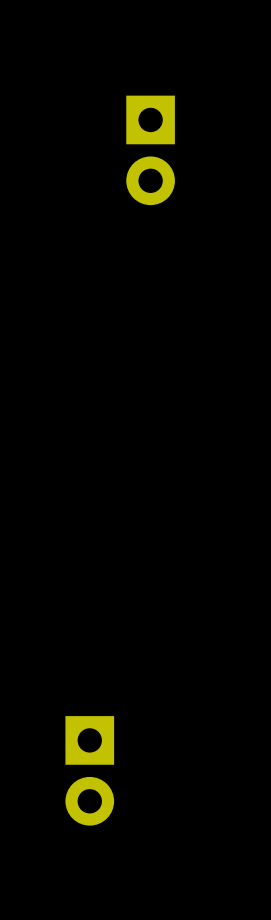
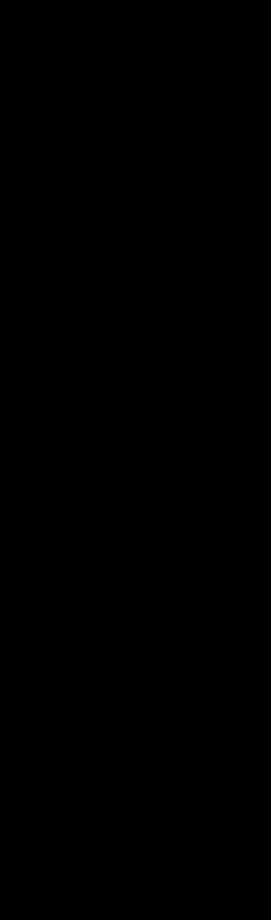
part: (150, 150) -> none
part: (89, 770) -> none

